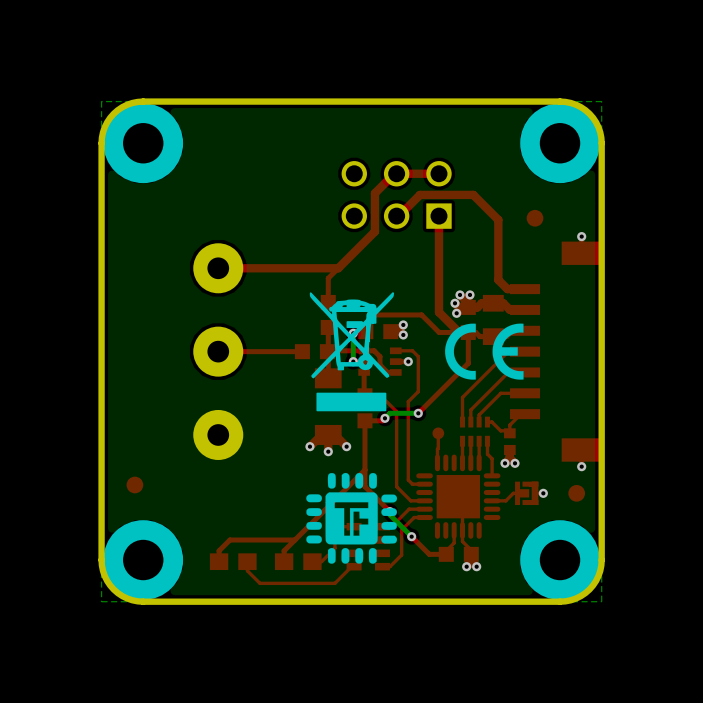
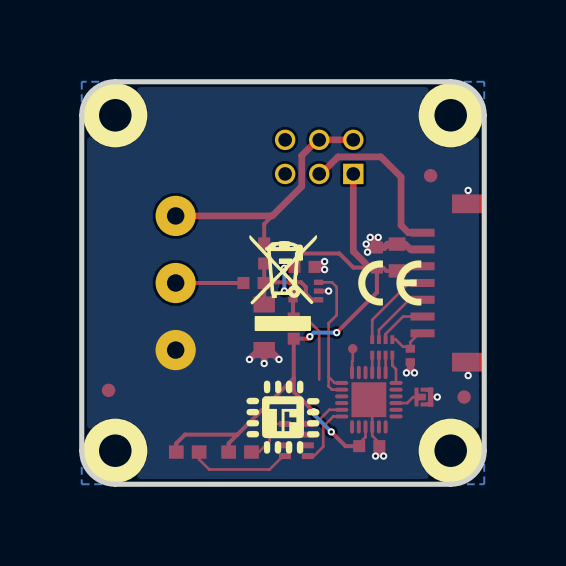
top track: none -> (328, 376) (334, 382) (341, 382)
top track: (396, 471) (396, 486) (410, 500) (424, 500) -> none

